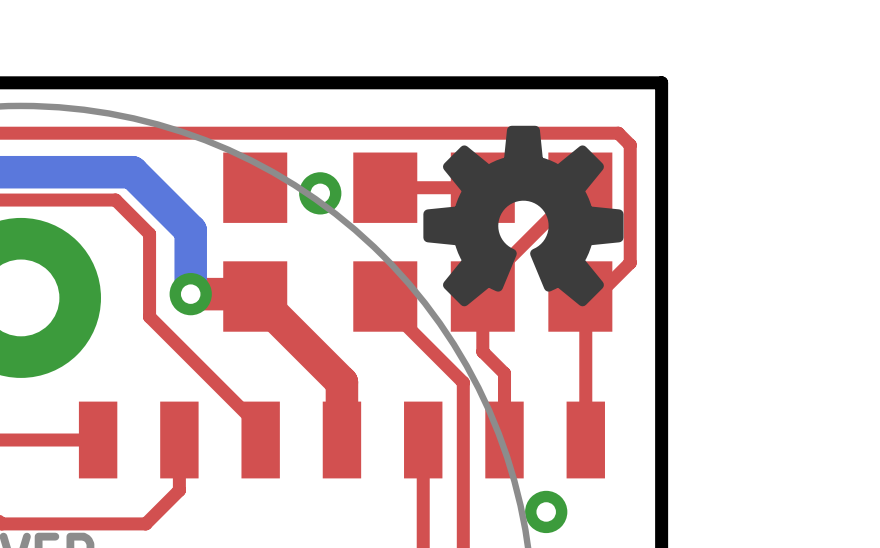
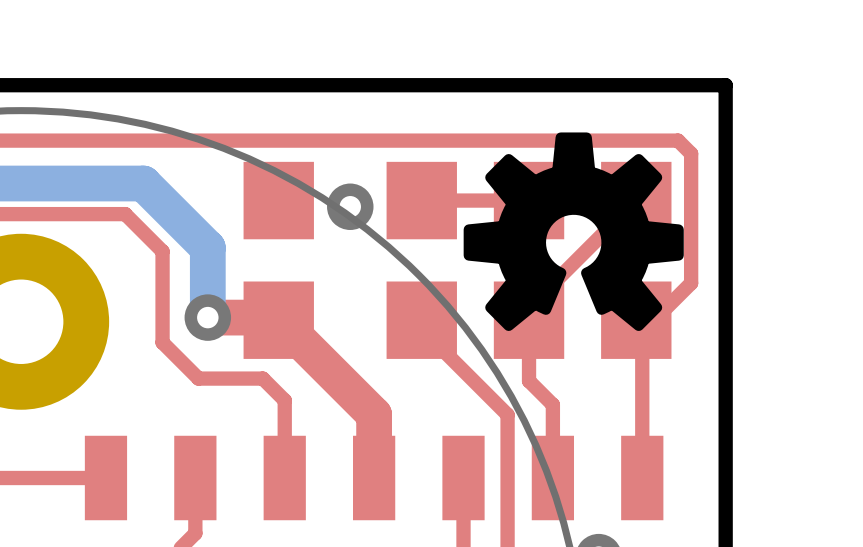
top track: (182, 349) (260, 428) -> (198, 378) (262, 378) (284, 400) (284, 464)

